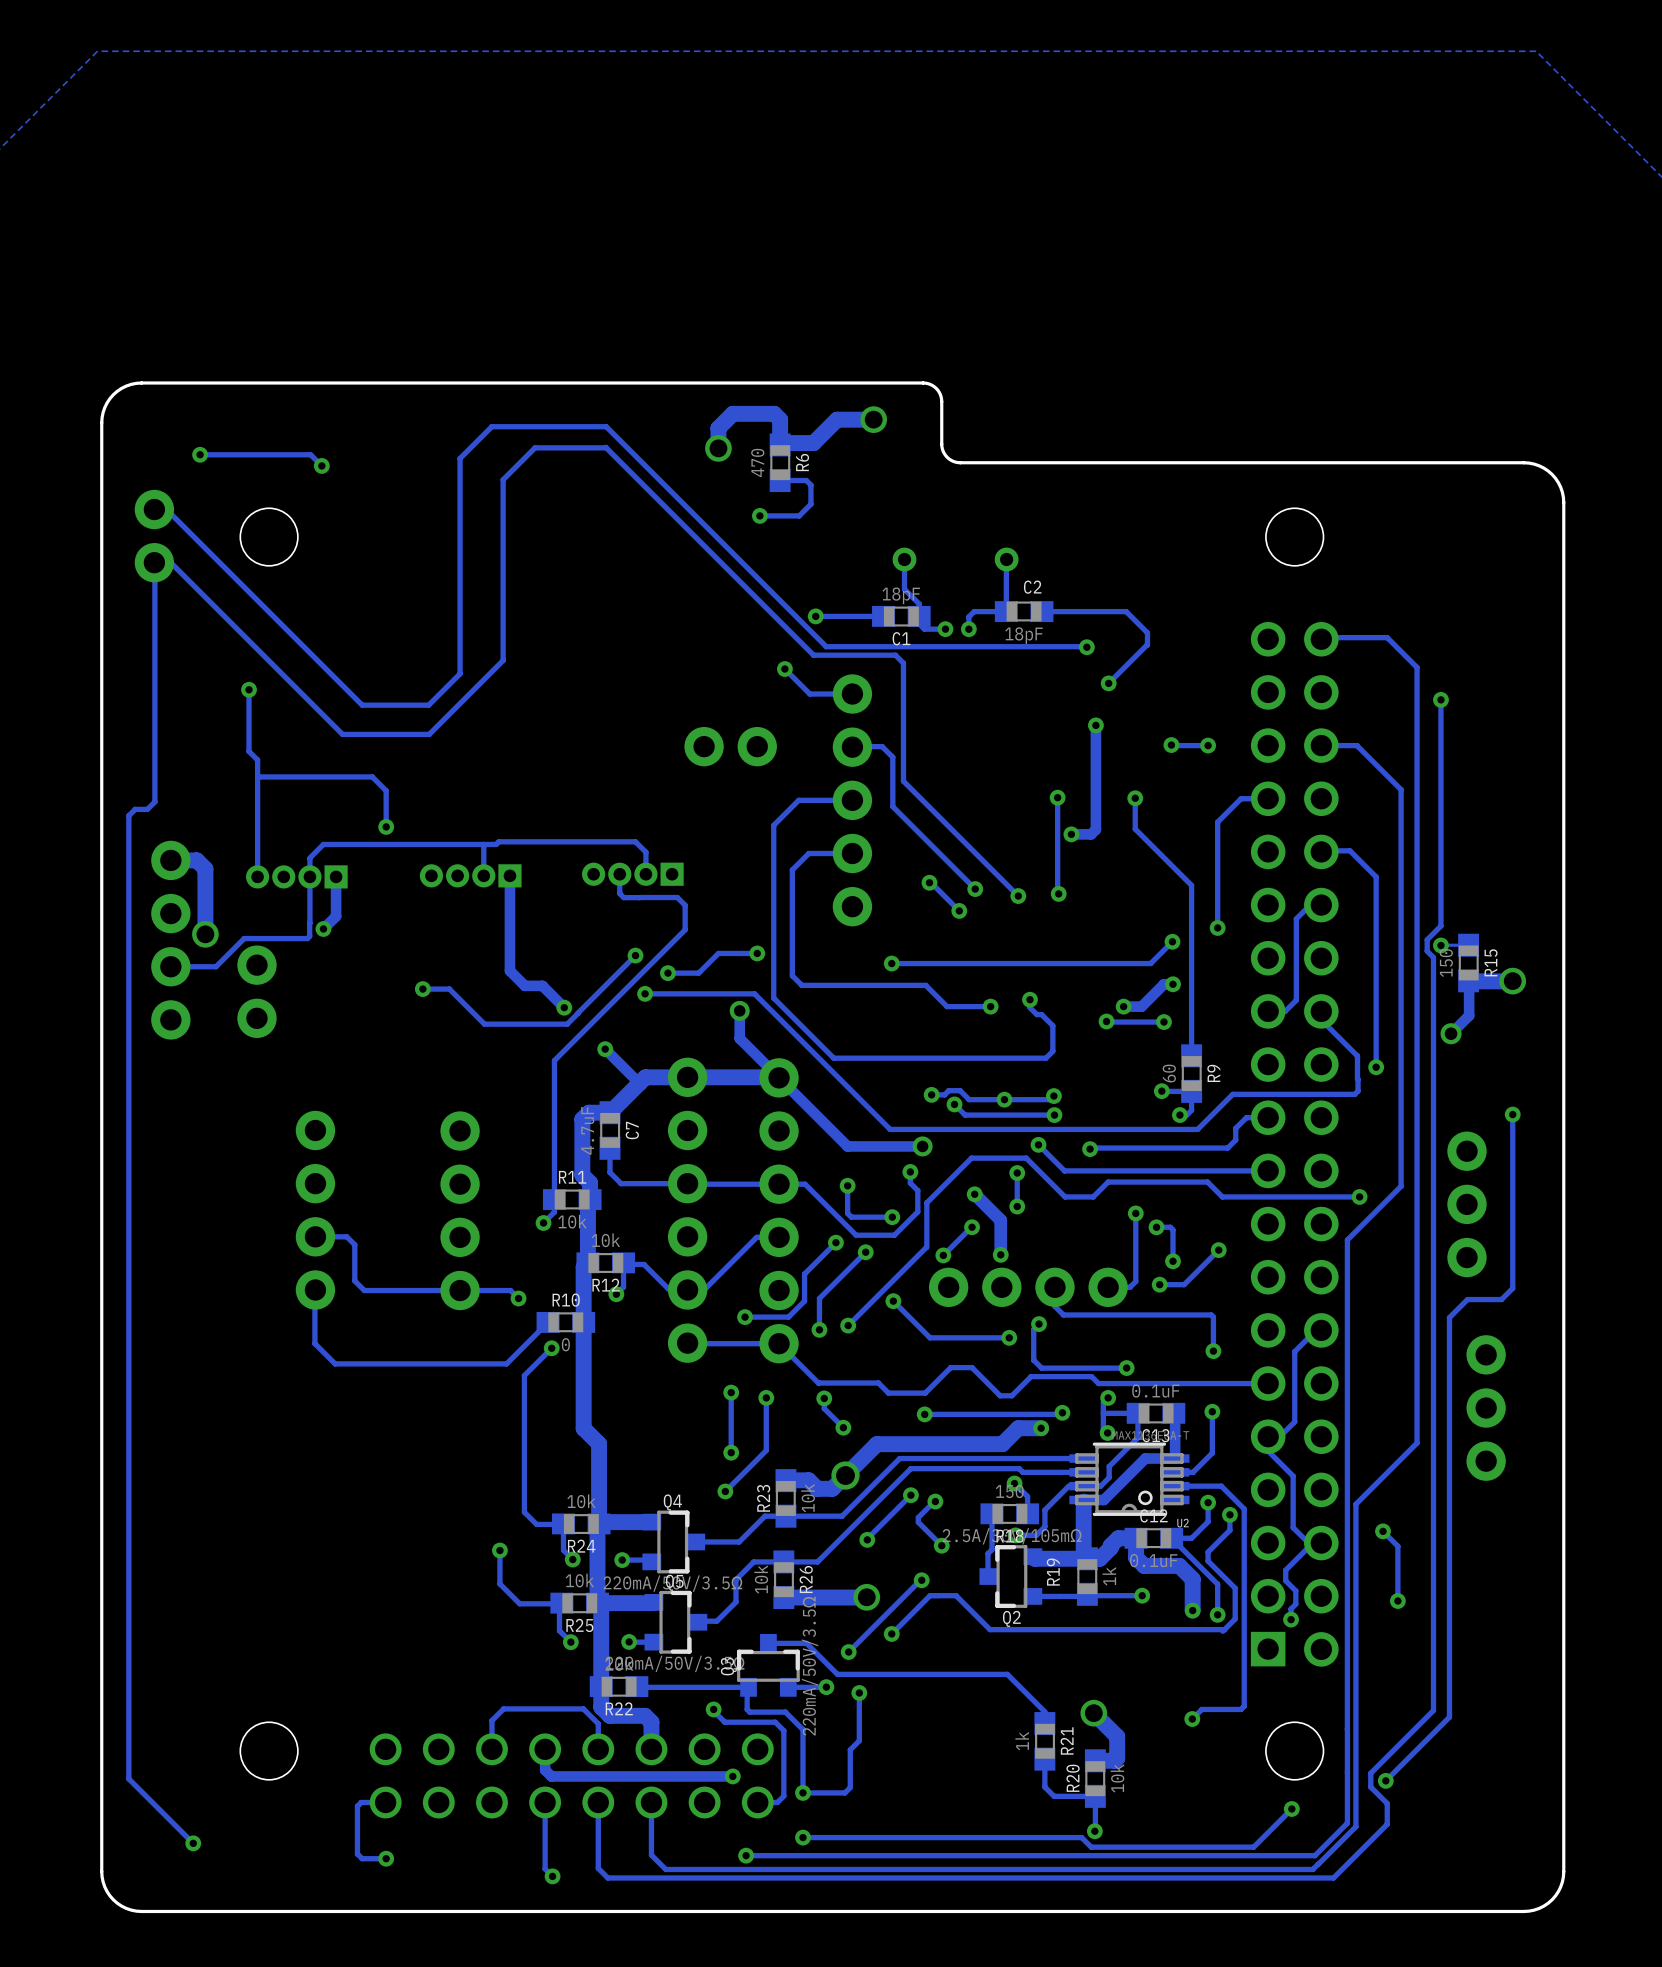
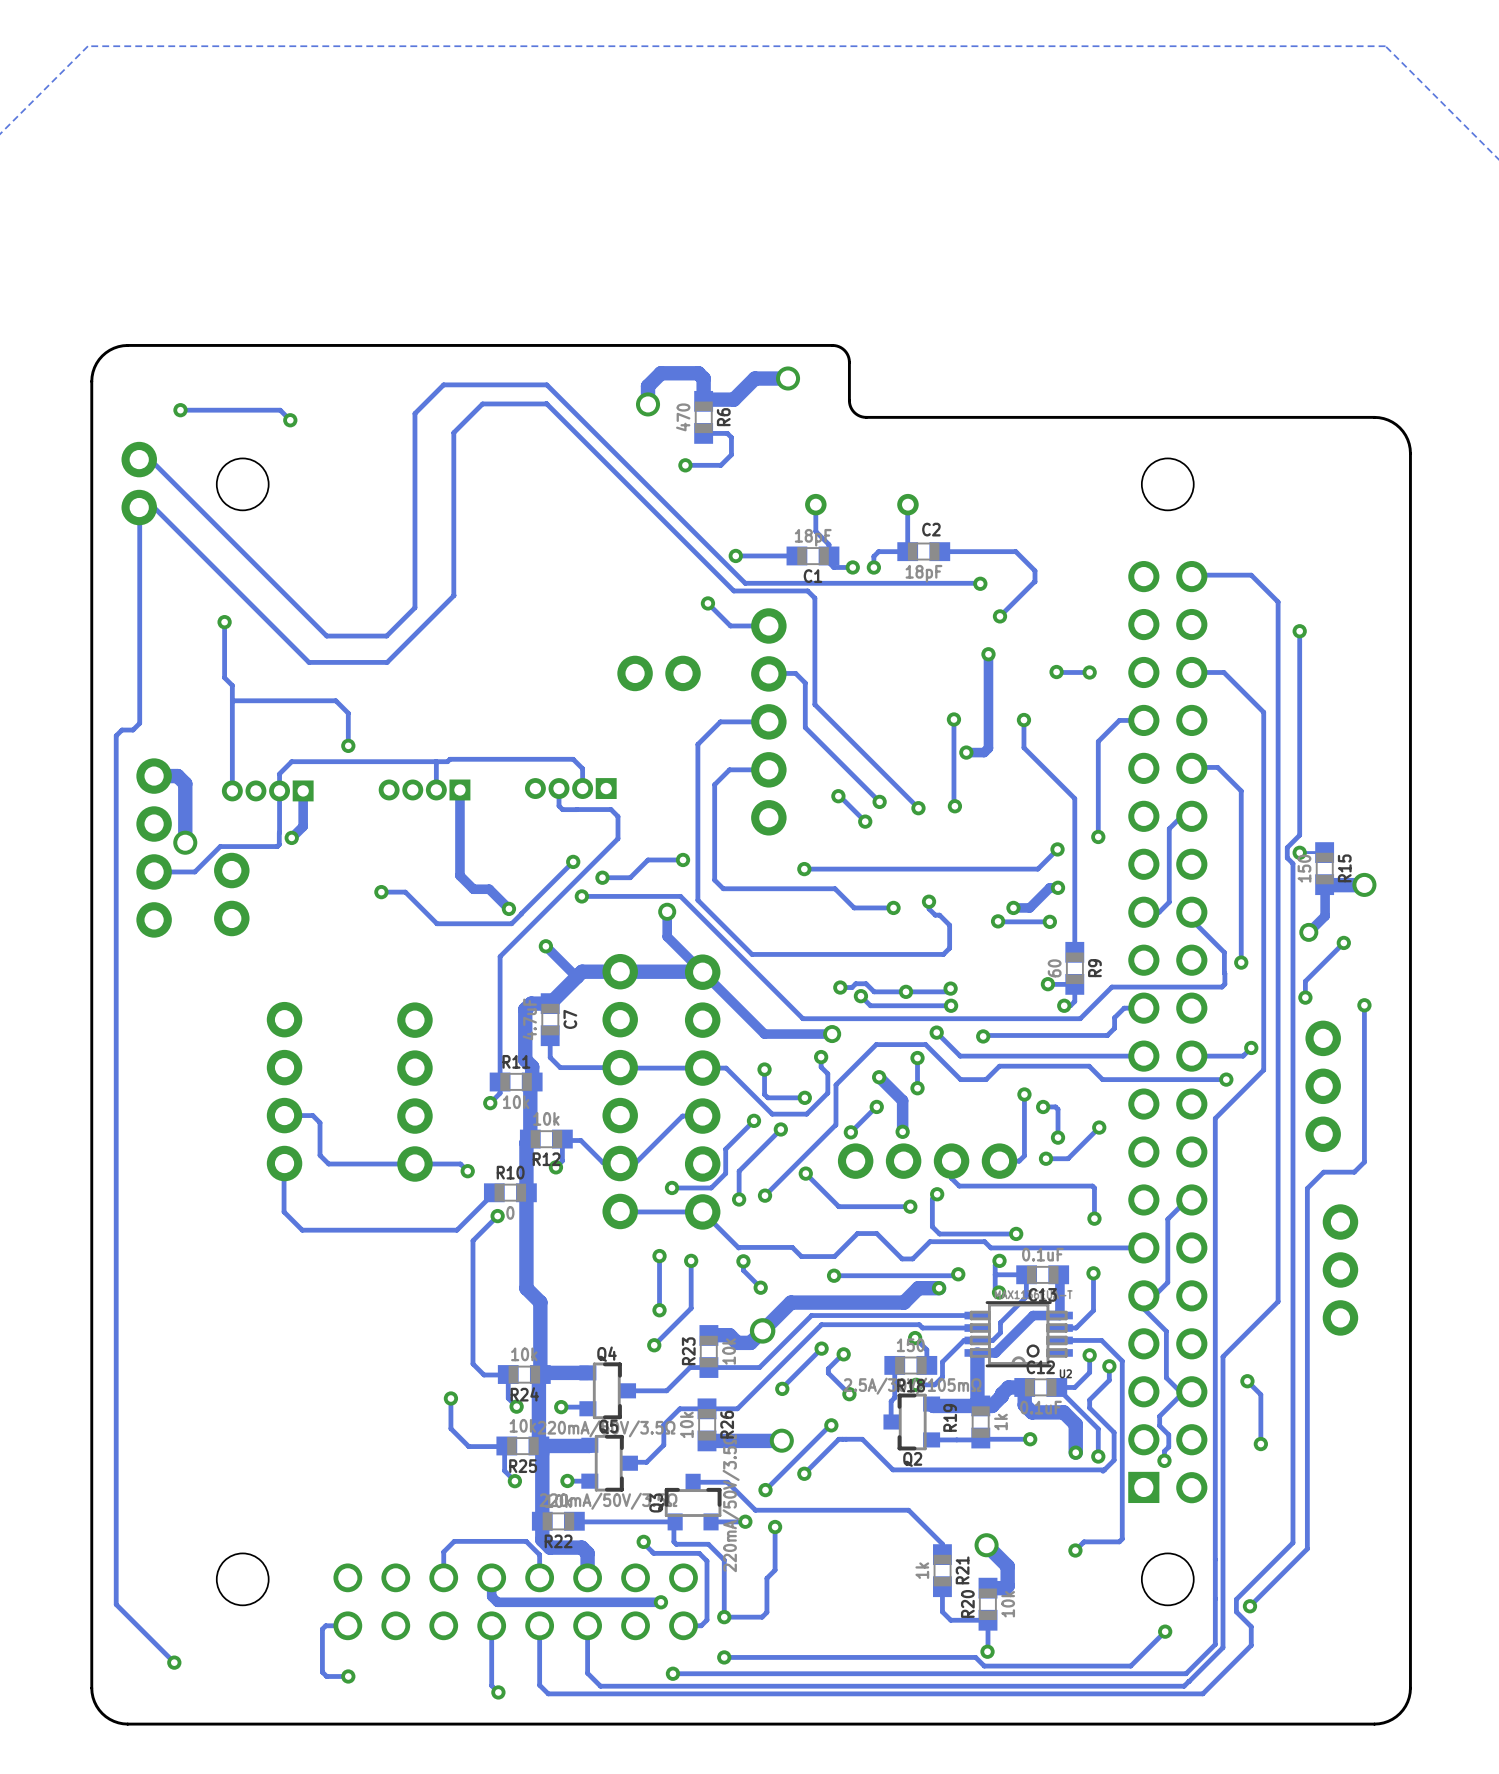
track: none -> (1343, 942) (1305, 981) (1305, 997)
via: none -> (1343, 942)
via: none -> (1305, 997)
track: none -> (1251, 1047) (1243, 1056) (1191, 1056)
via: none -> (1251, 1047)

